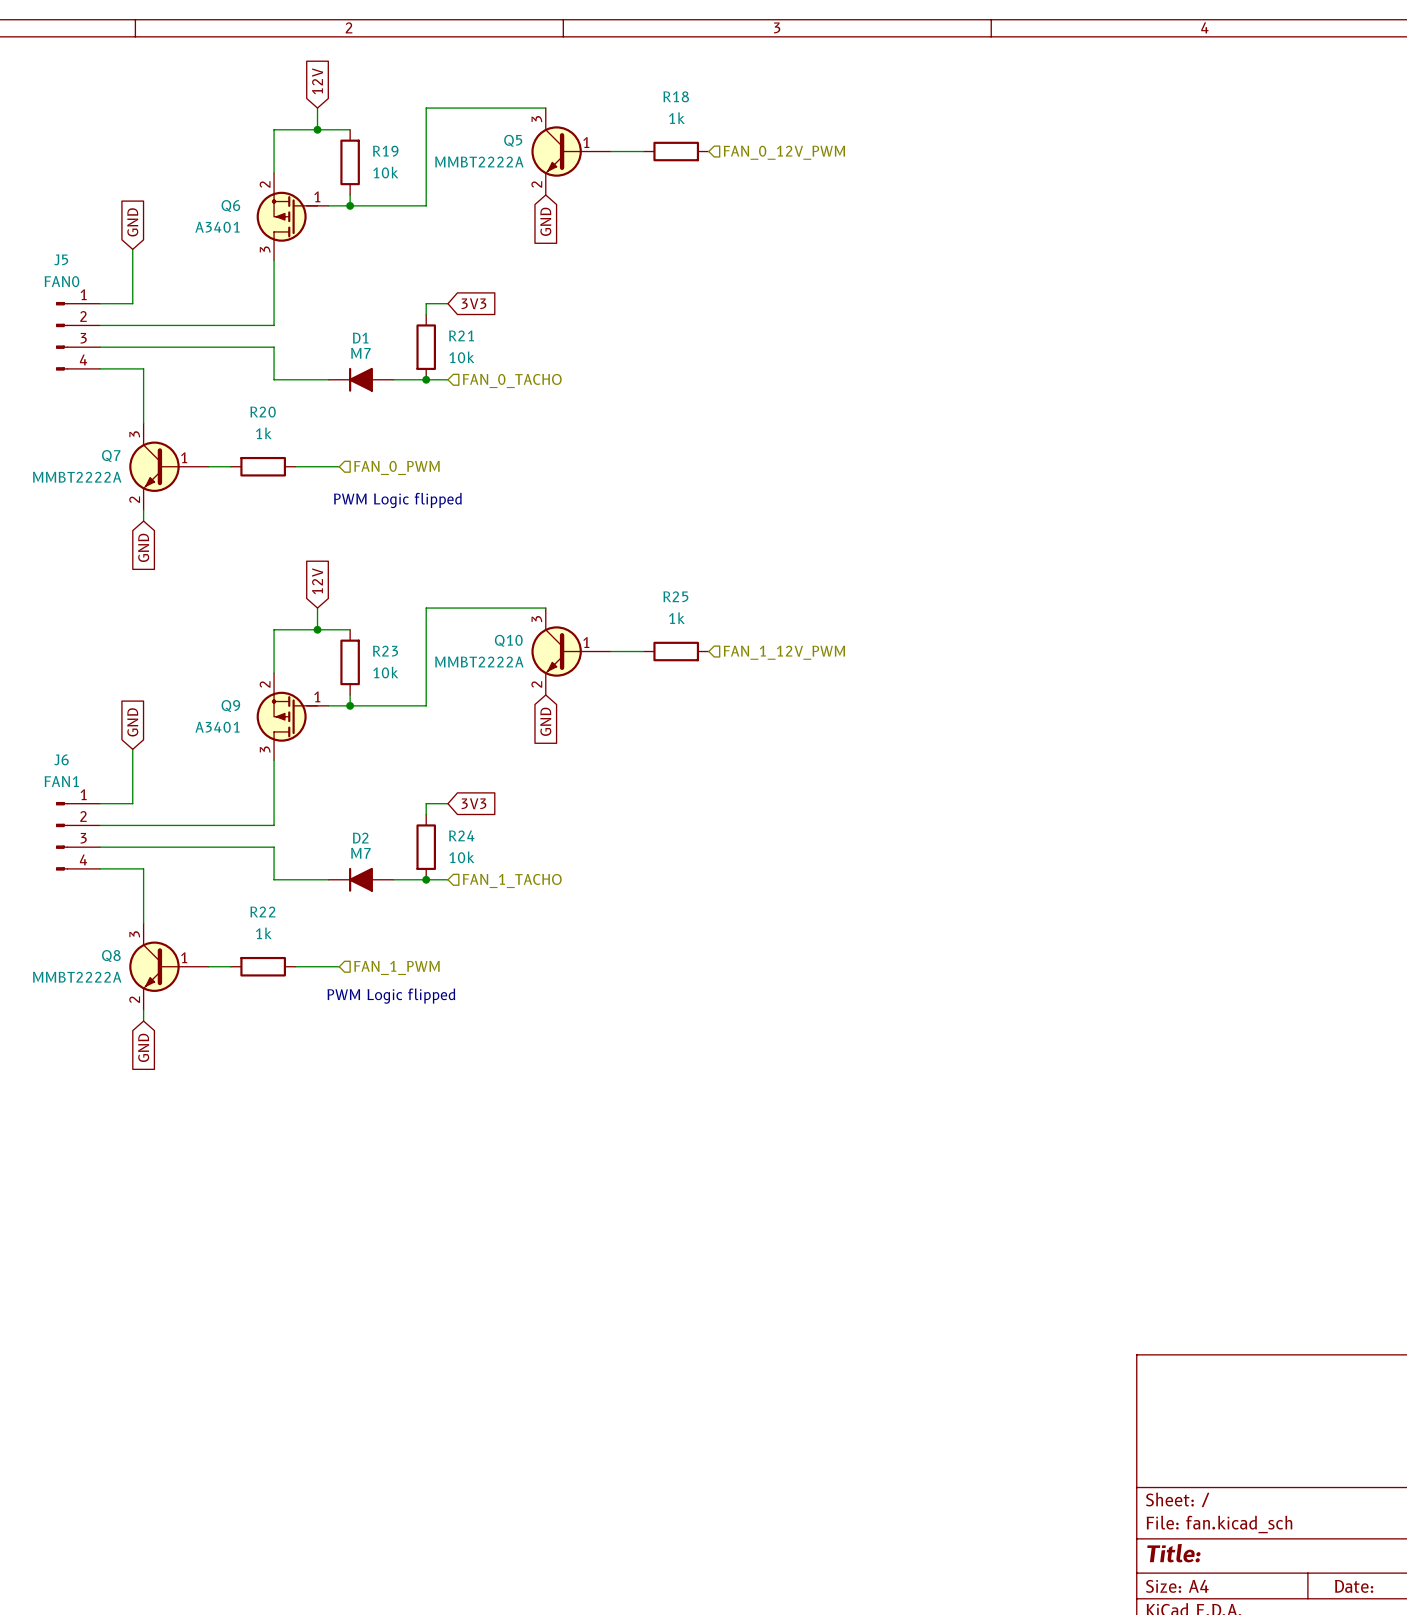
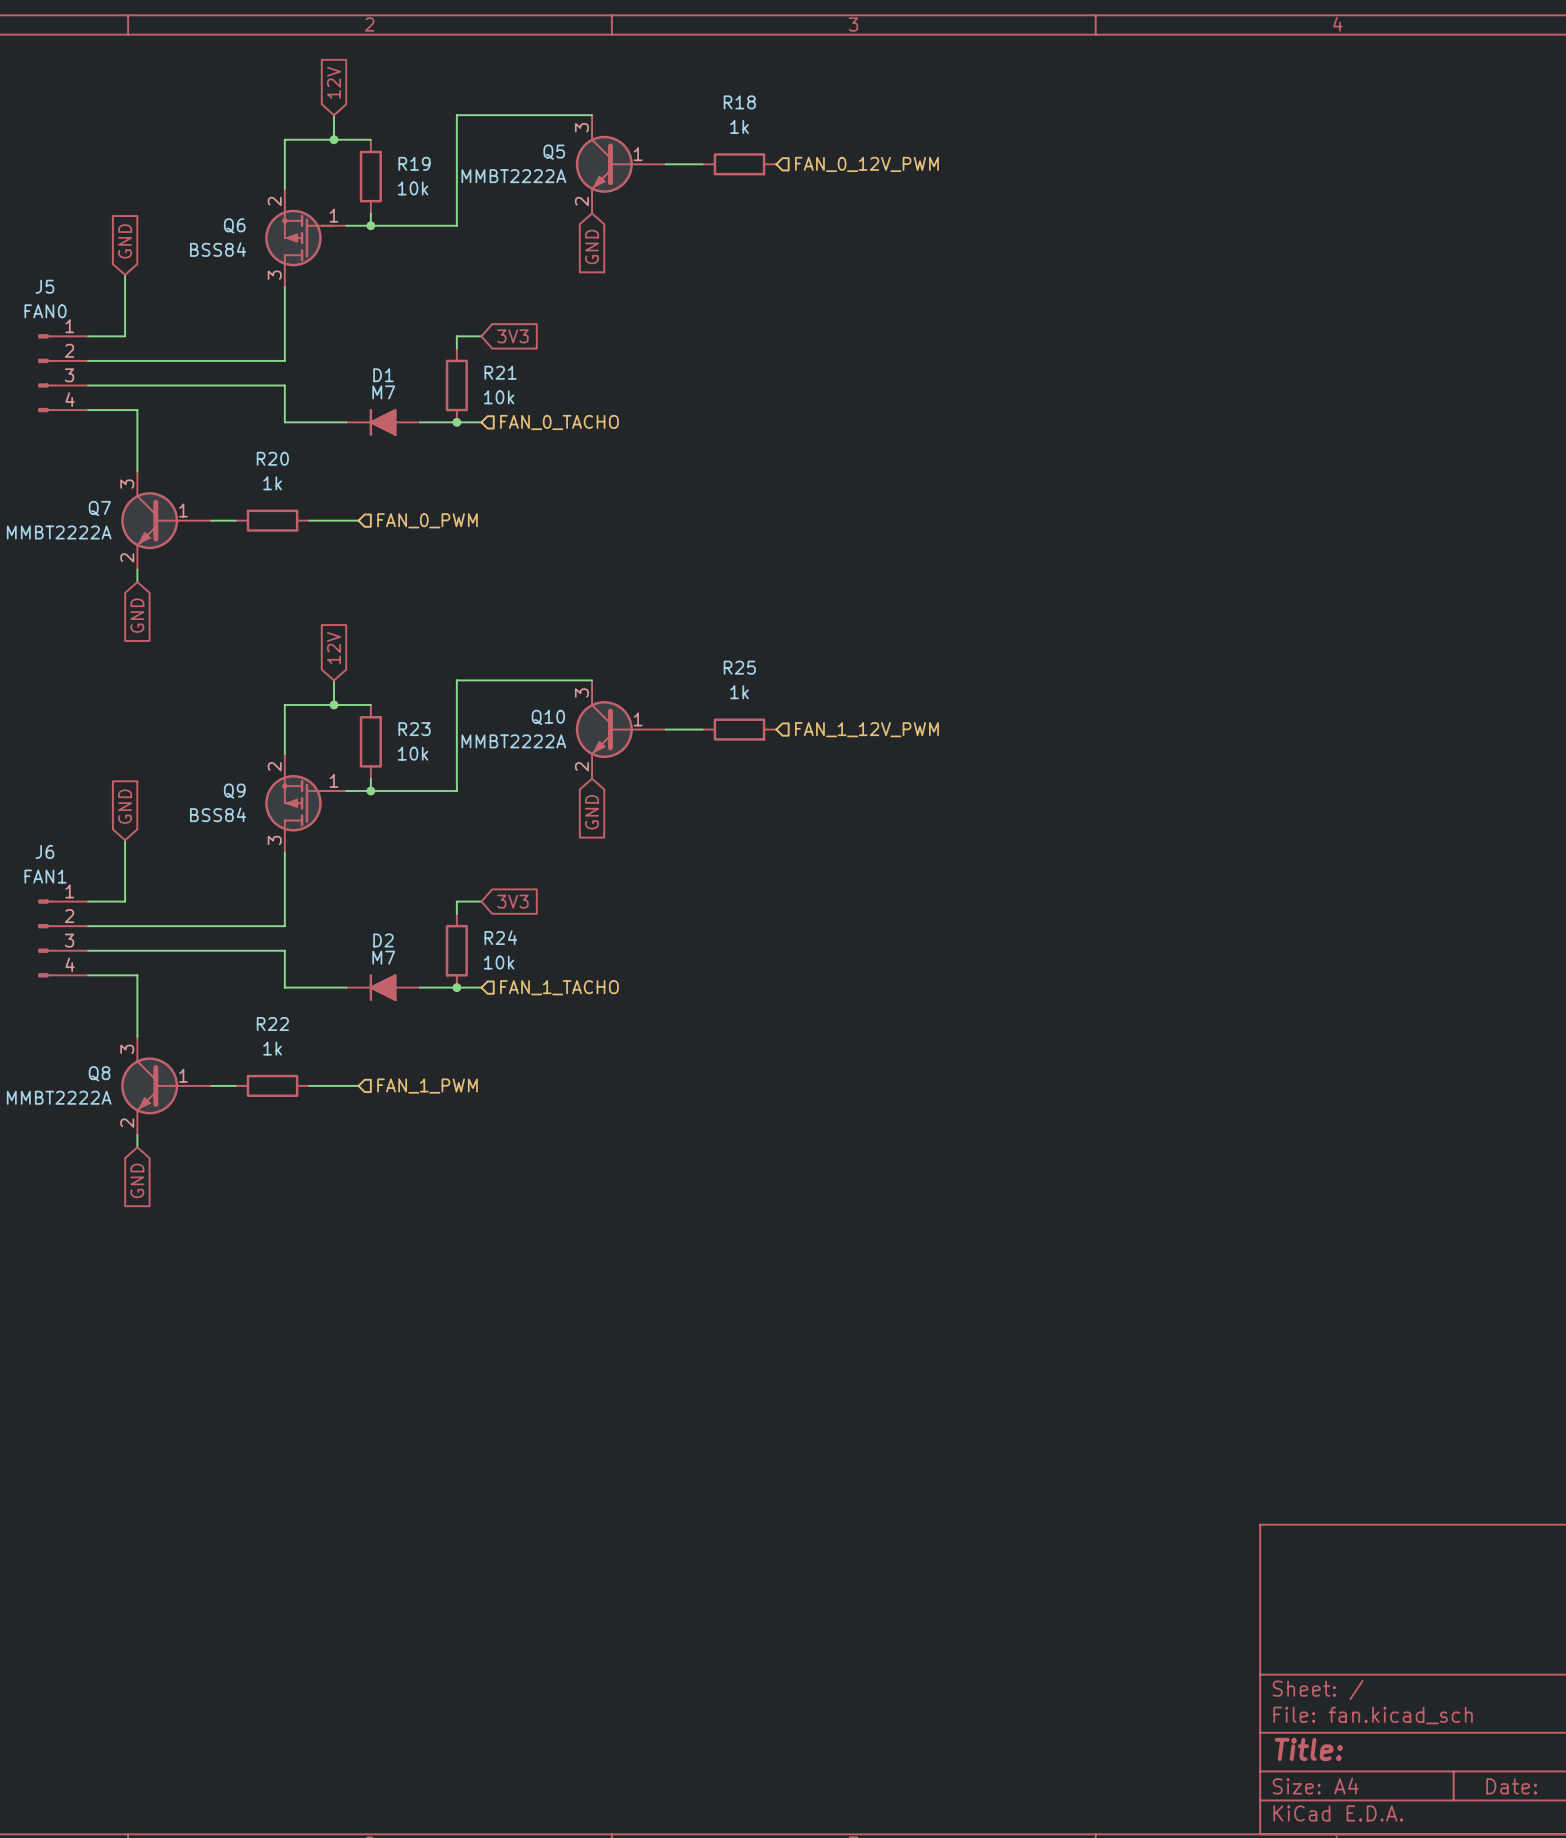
Q6 value: A3401 (217, 227) -> BSS84 (218, 249)
text: PWM Logic flipped (397, 500) -> none
Q9 value: A3401 (217, 727) -> BSS84 (218, 814)
text: PWM Logic flipped (391, 996) -> none

